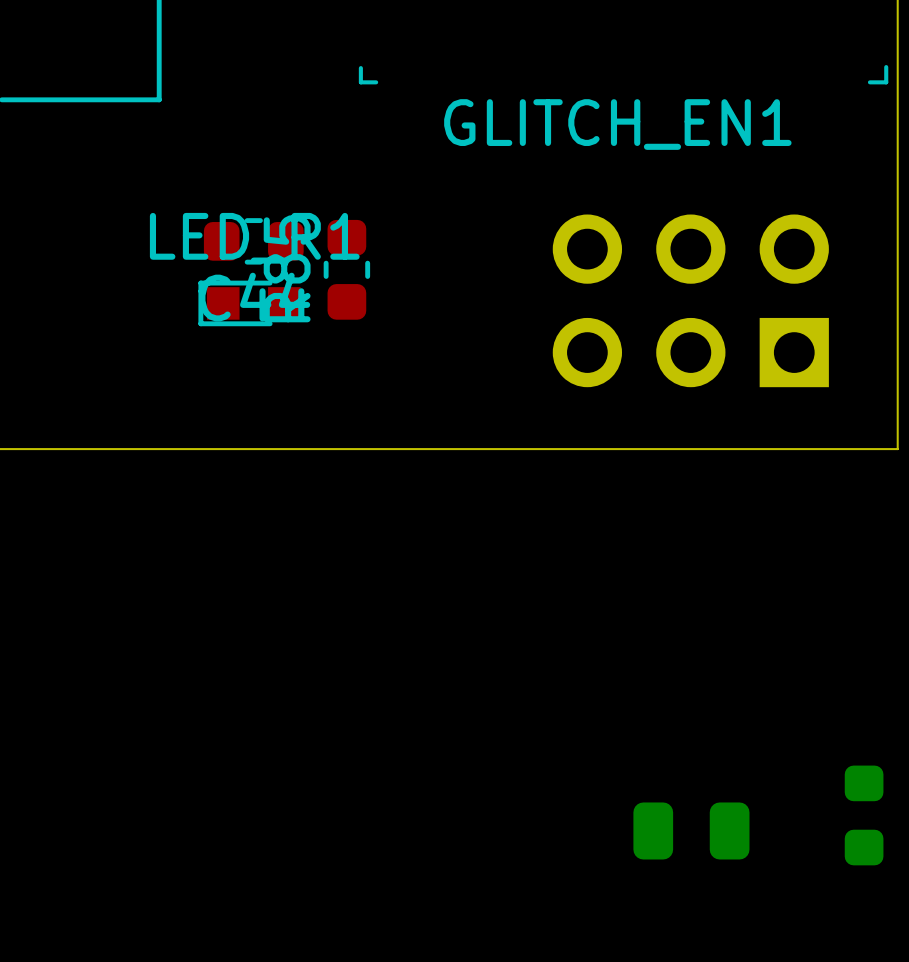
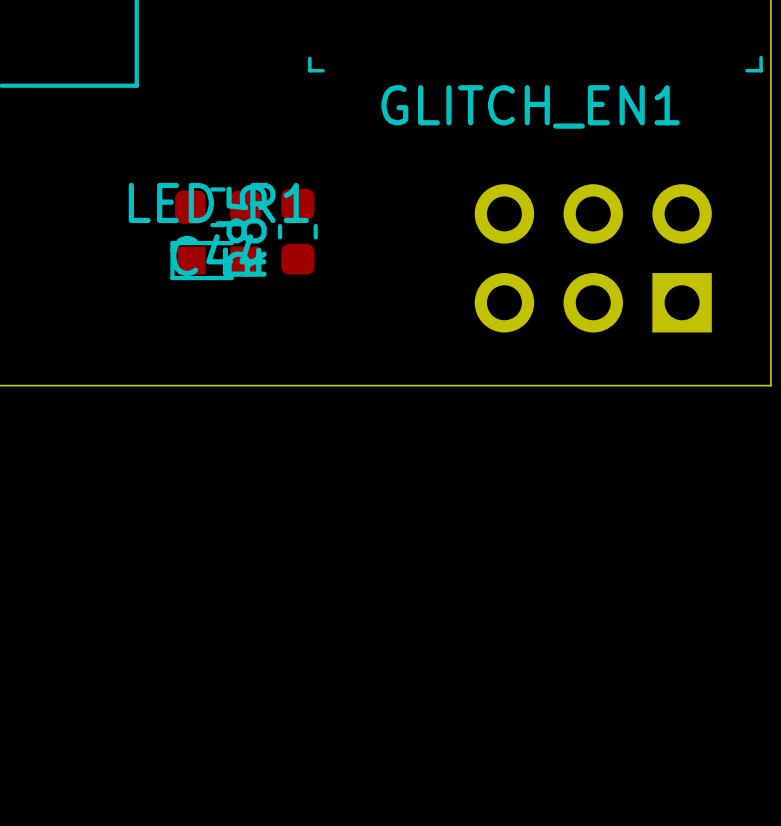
part: (864, 815) -> none
part: (691, 830) -> none

